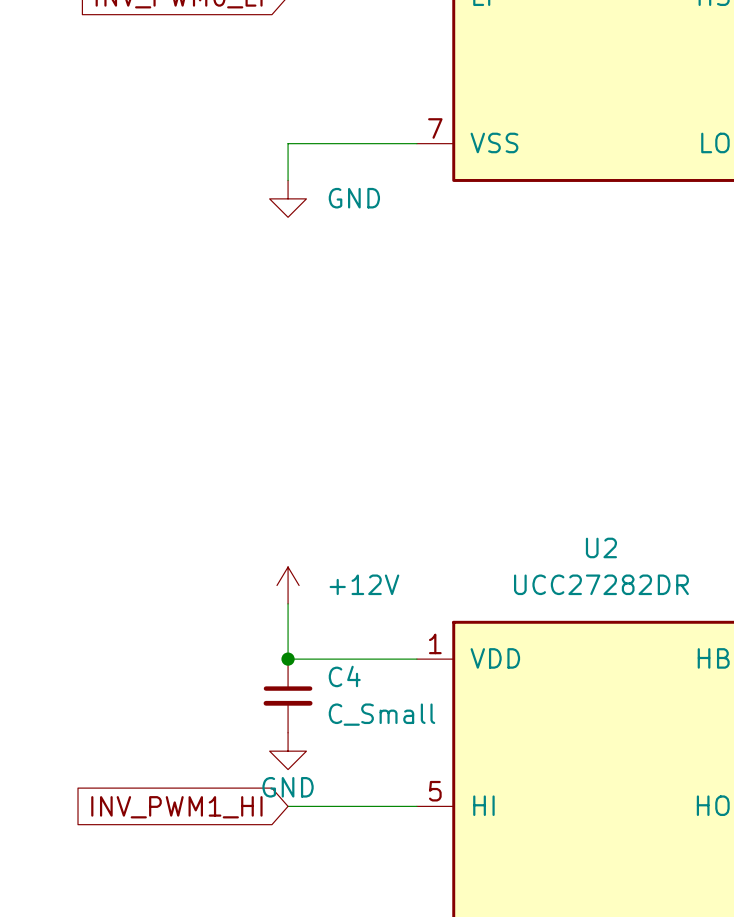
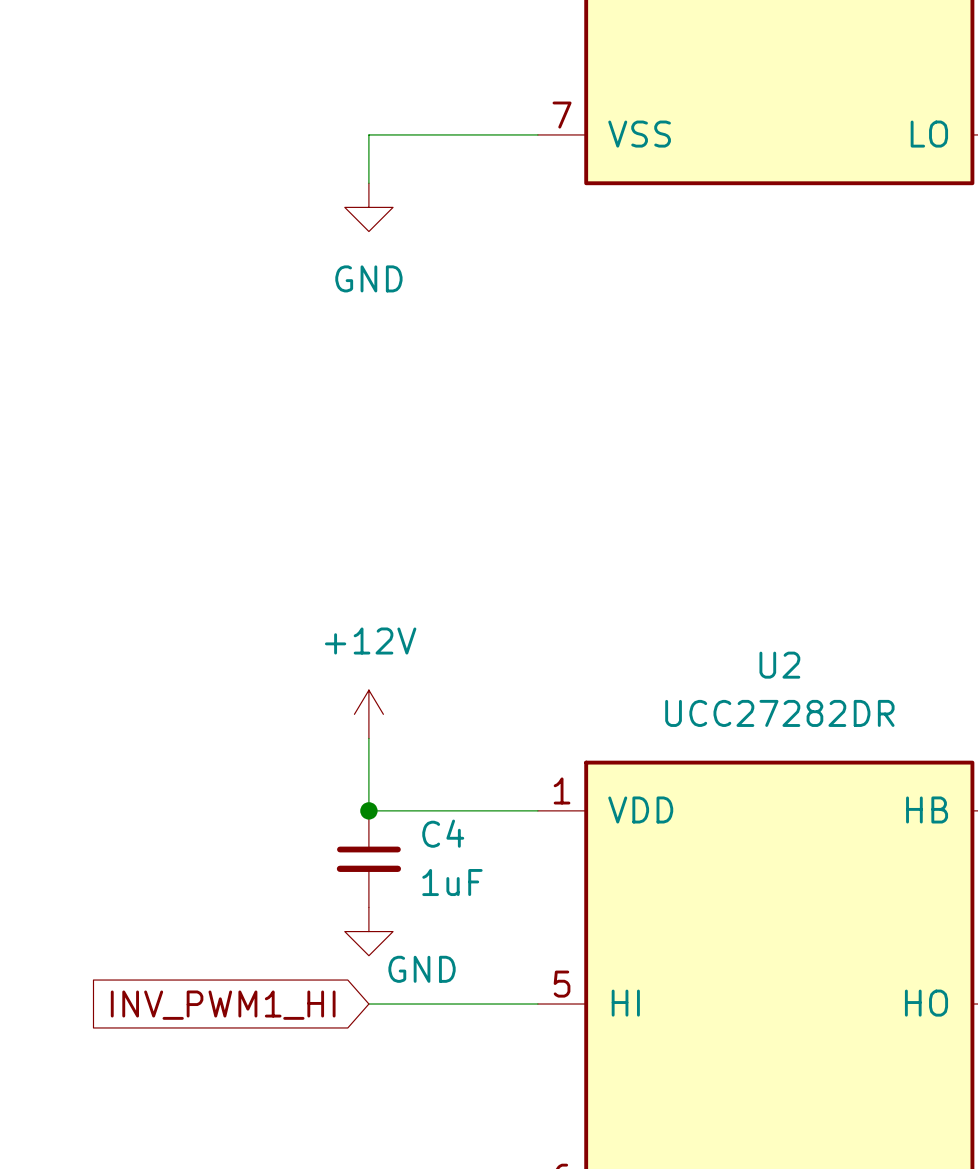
power symbol text position: GND (354, 198) -> GND (368, 278)
power symbol text position: +12V (364, 584) -> +12V (370, 641)
C4 value: C_Small (381, 714) -> 1uF (452, 882)
power symbol text position: GND (288, 787) -> GND (422, 969)

